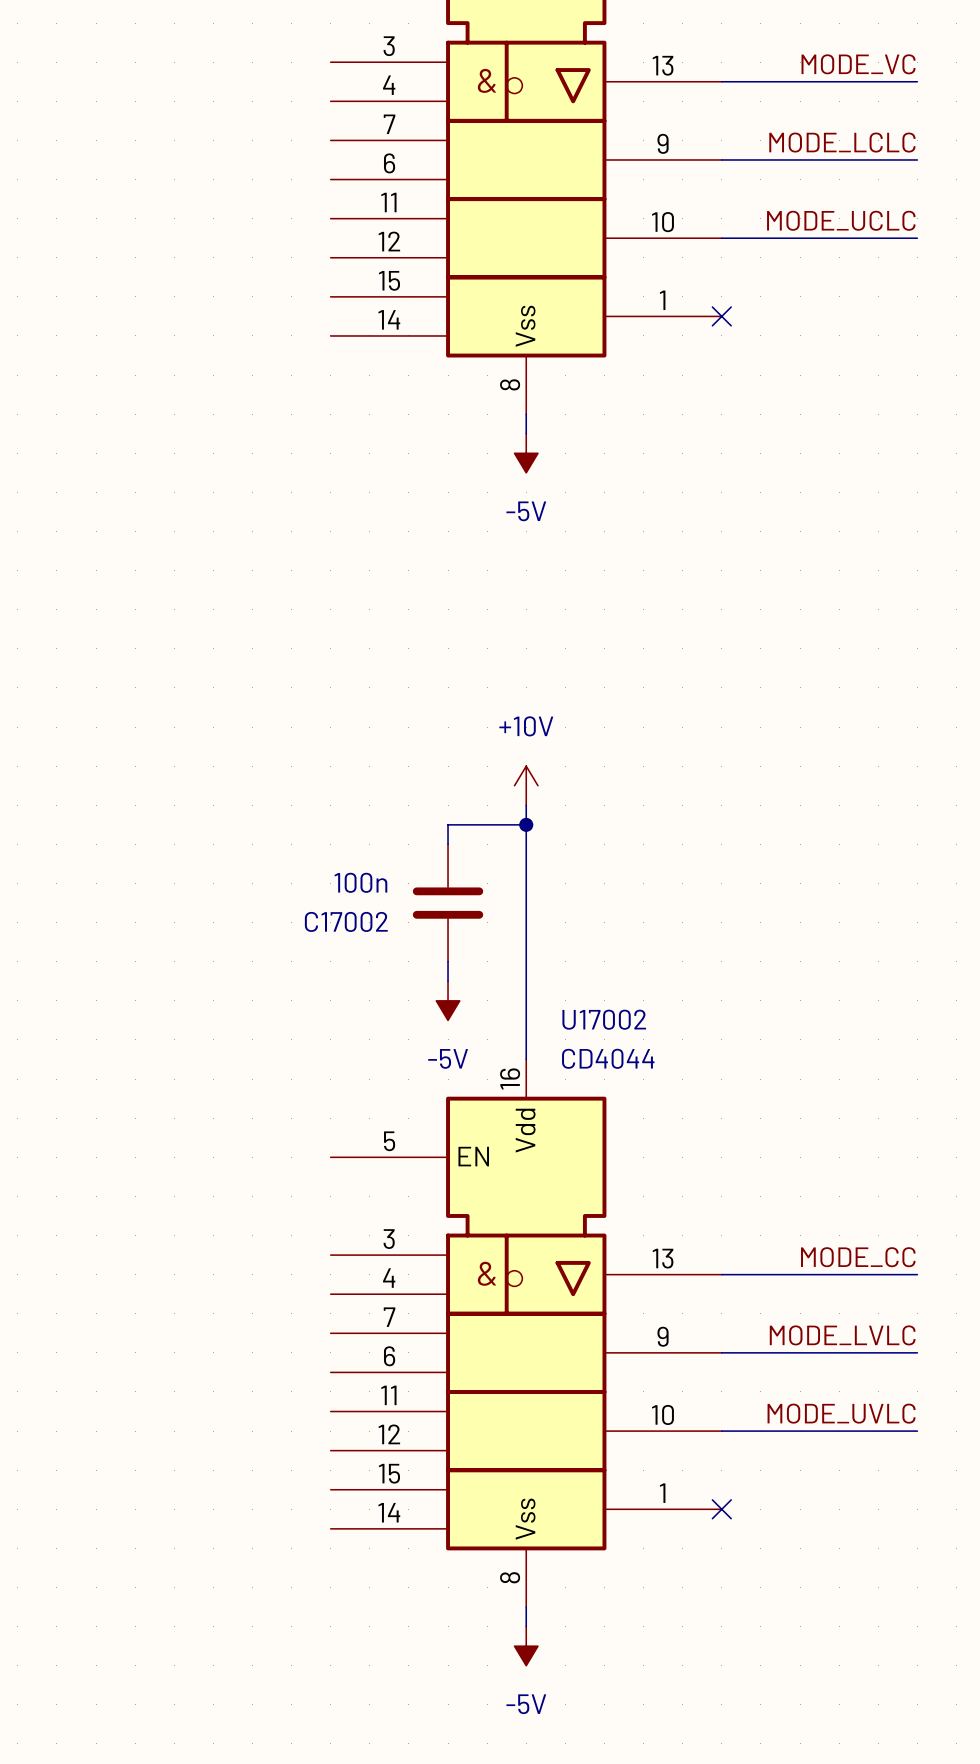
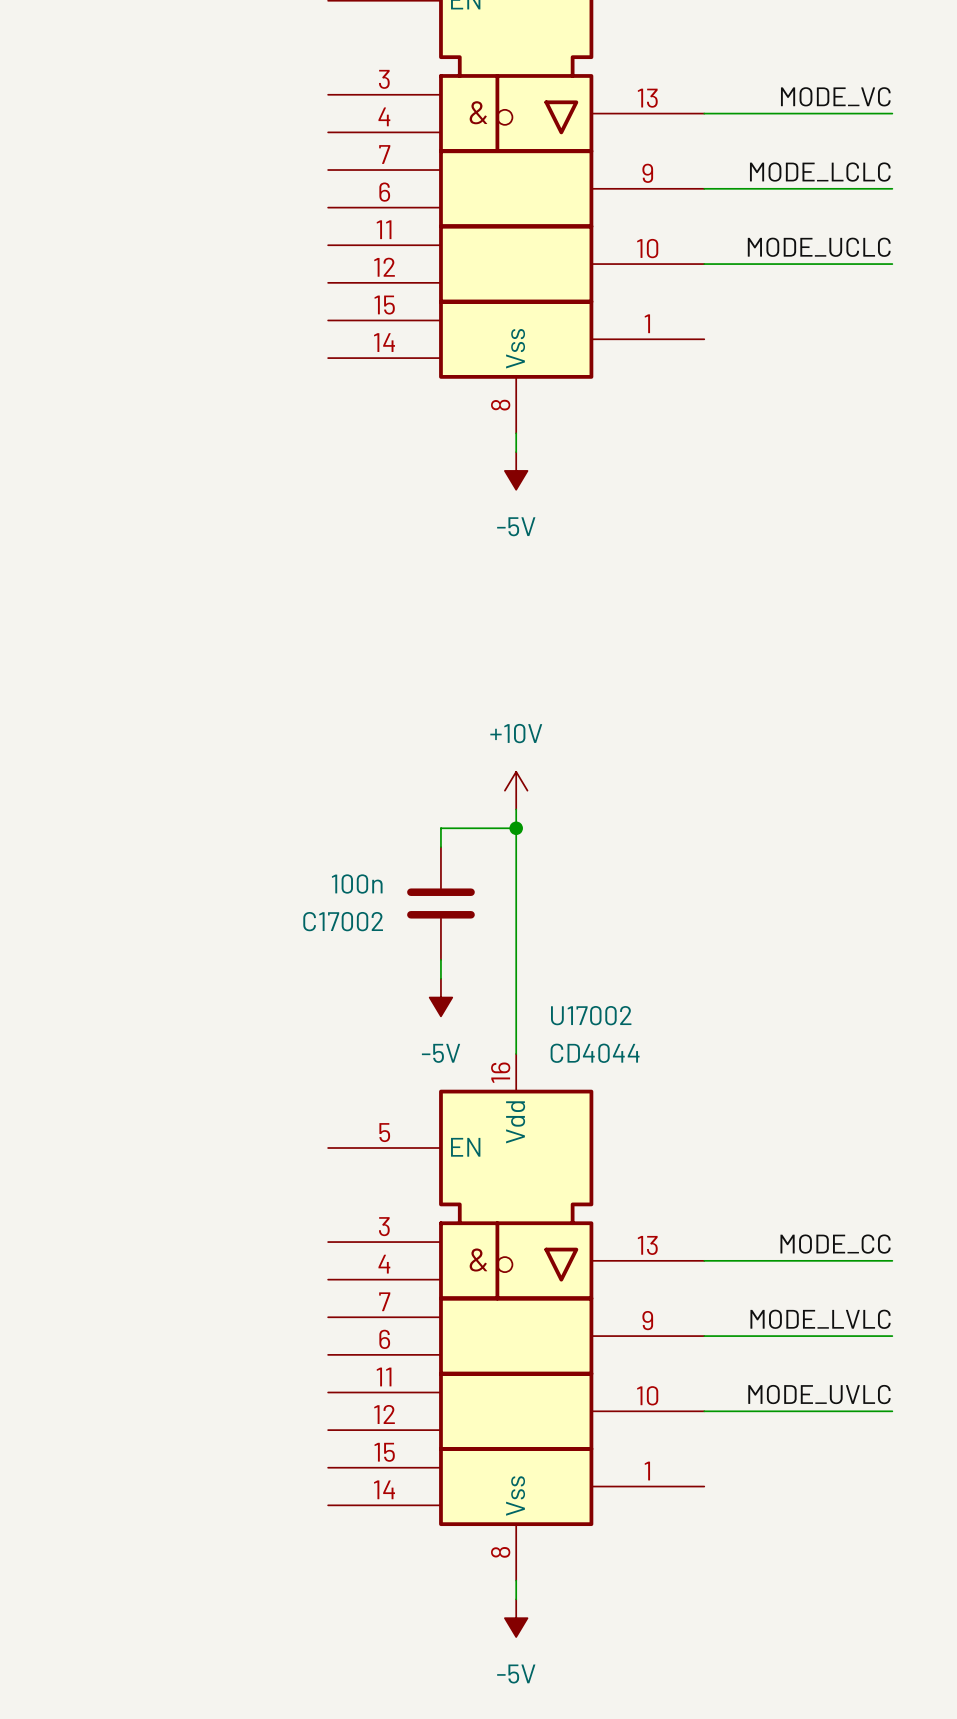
no-connect mark: (721, 316) -> none
no-connect mark: (721, 1509) -> none

